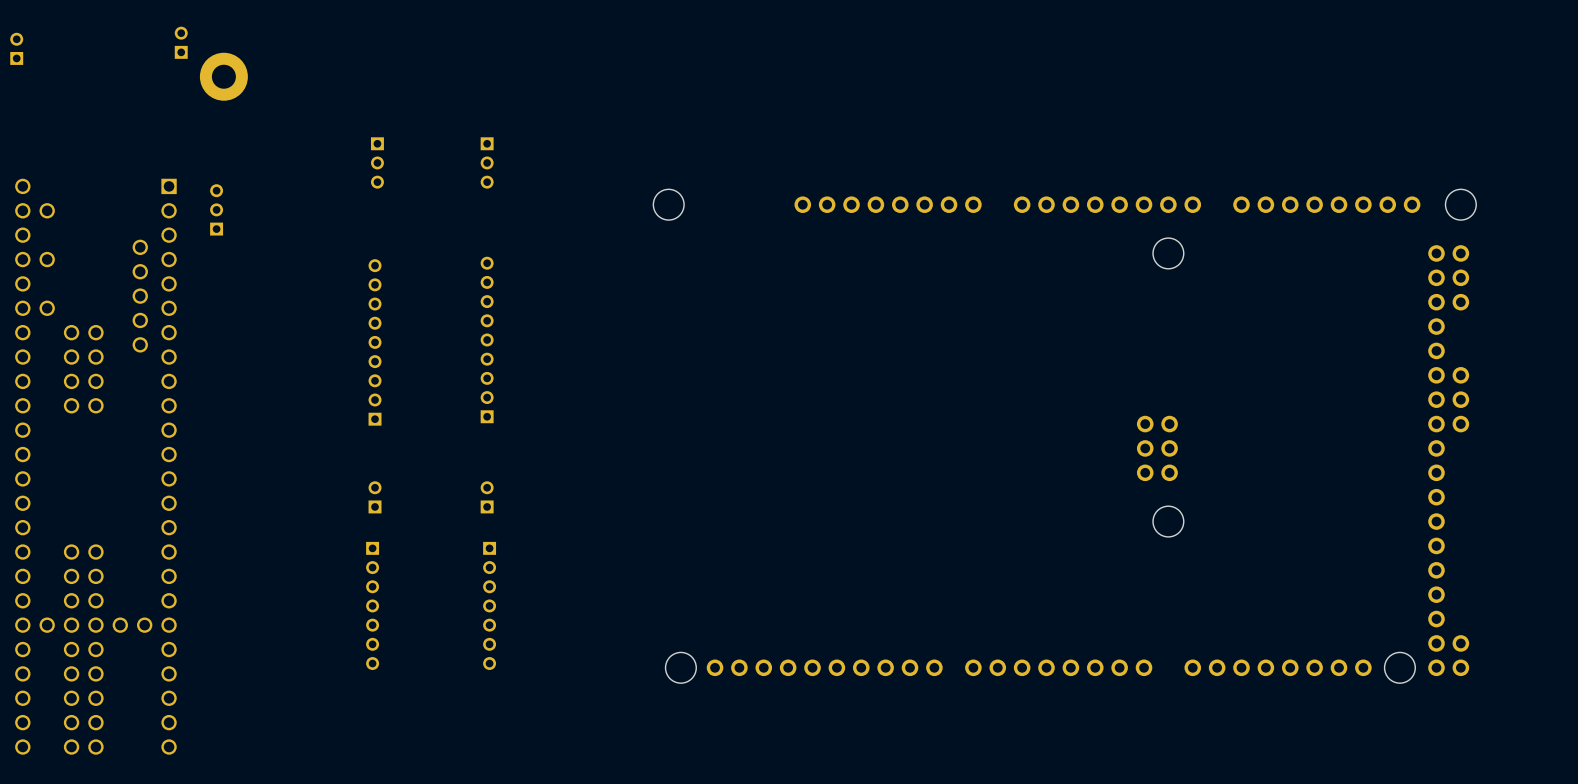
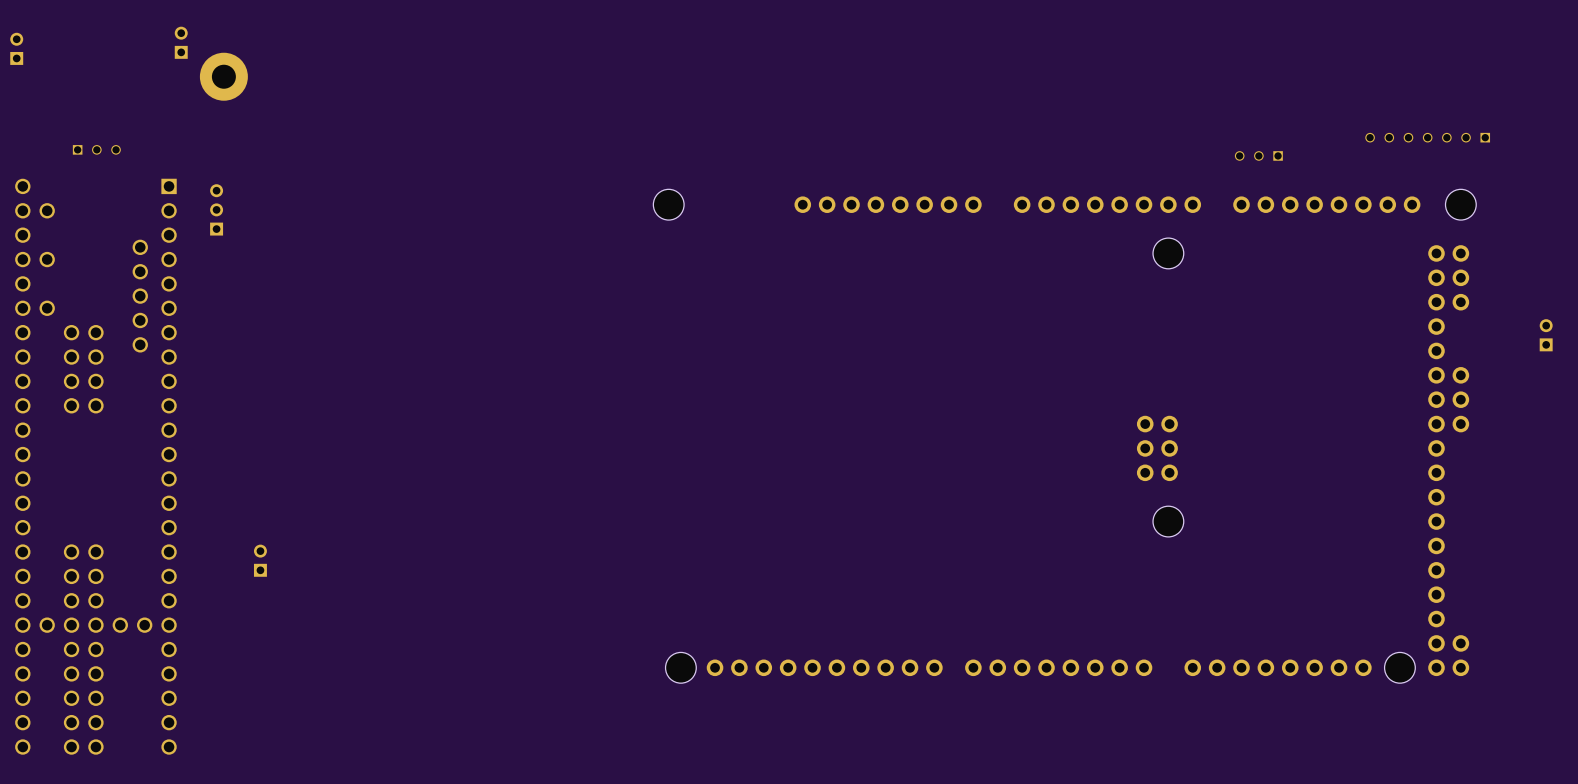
part: none -> (1427, 137)
part: none -> (96, 149)
part: none -> (1258, 155)
part: (377, 162) -> none
part: (487, 162) -> none
part: none -> (1546, 335)
part: (487, 339) -> none
part: (375, 342) -> none
part: (375, 497) -> none
part: (487, 497) -> none
part: none -> (260, 560)
part: (372, 605) -> none
part: (489, 605) -> none

